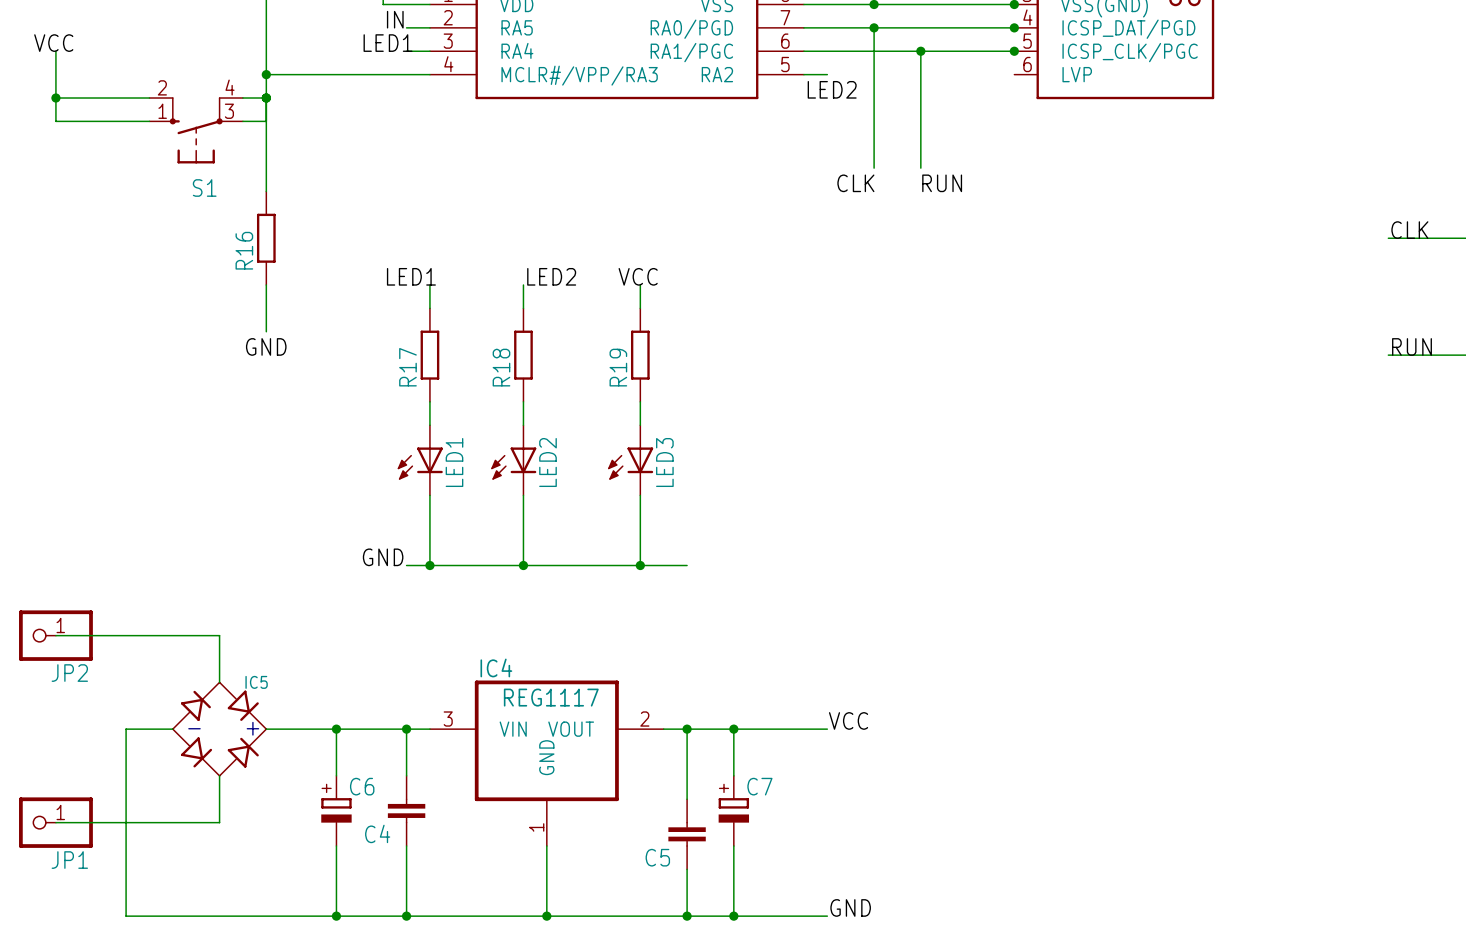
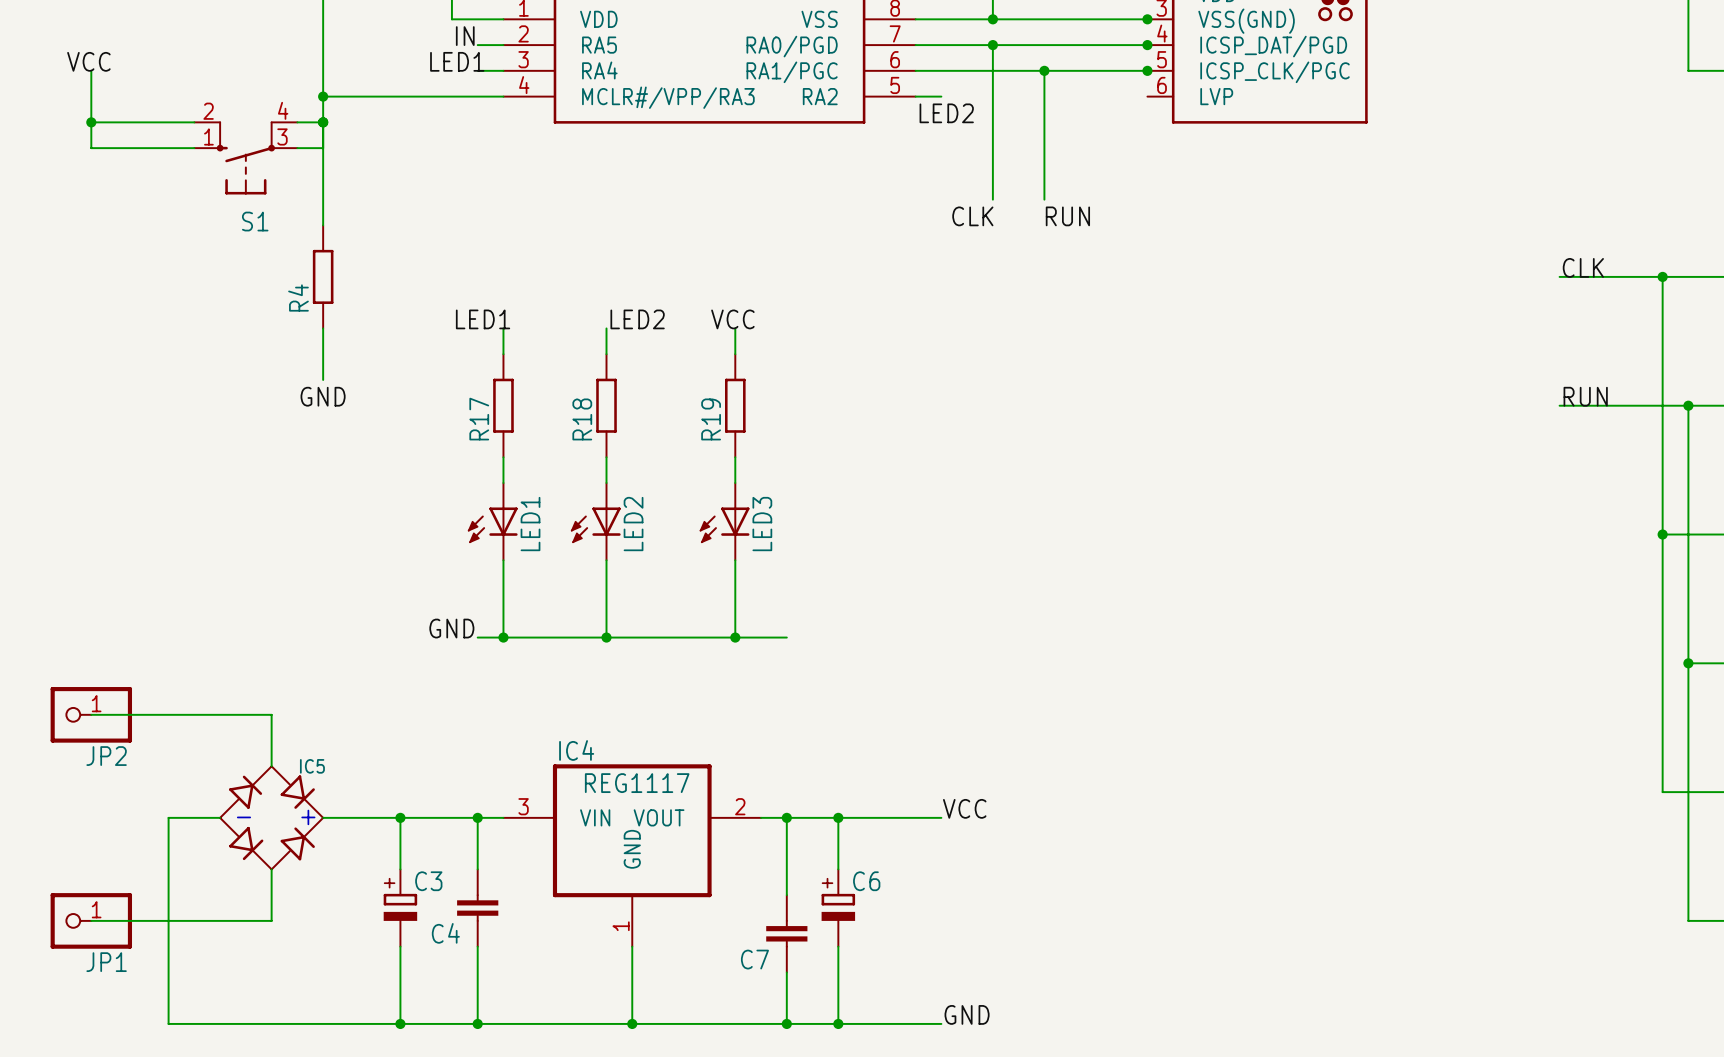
R16 name: R16 (244, 250) -> R4 (298, 298)
C6 name: C6 (362, 786) -> C3 (428, 881)
C7 name: C7 (759, 786) -> C6 (866, 881)
C5 name: C5 (657, 857) -> C7 (754, 959)

